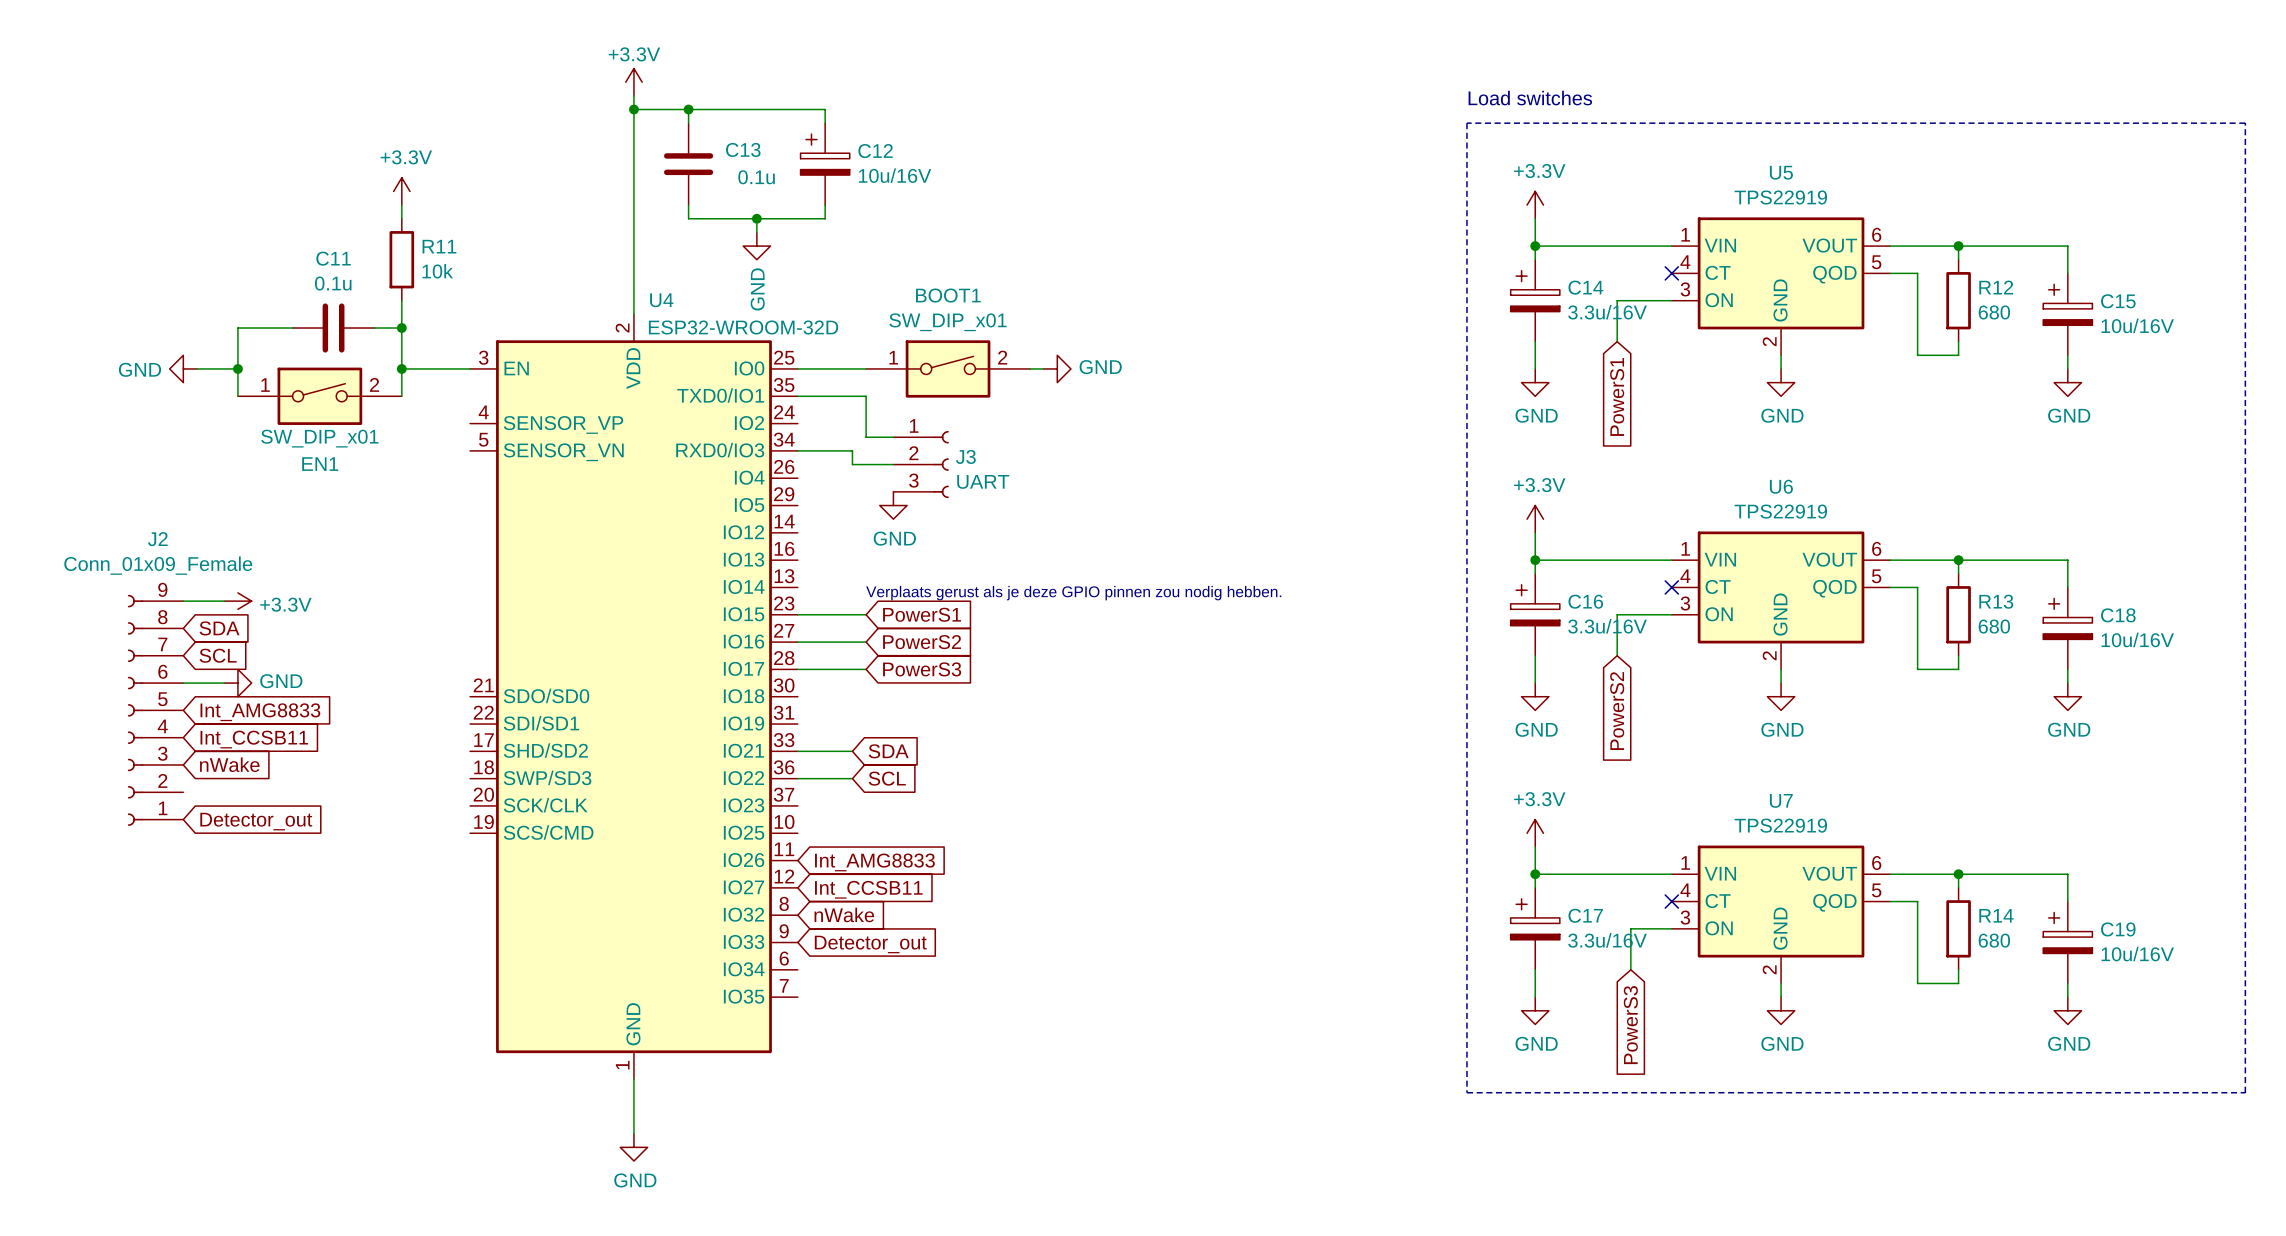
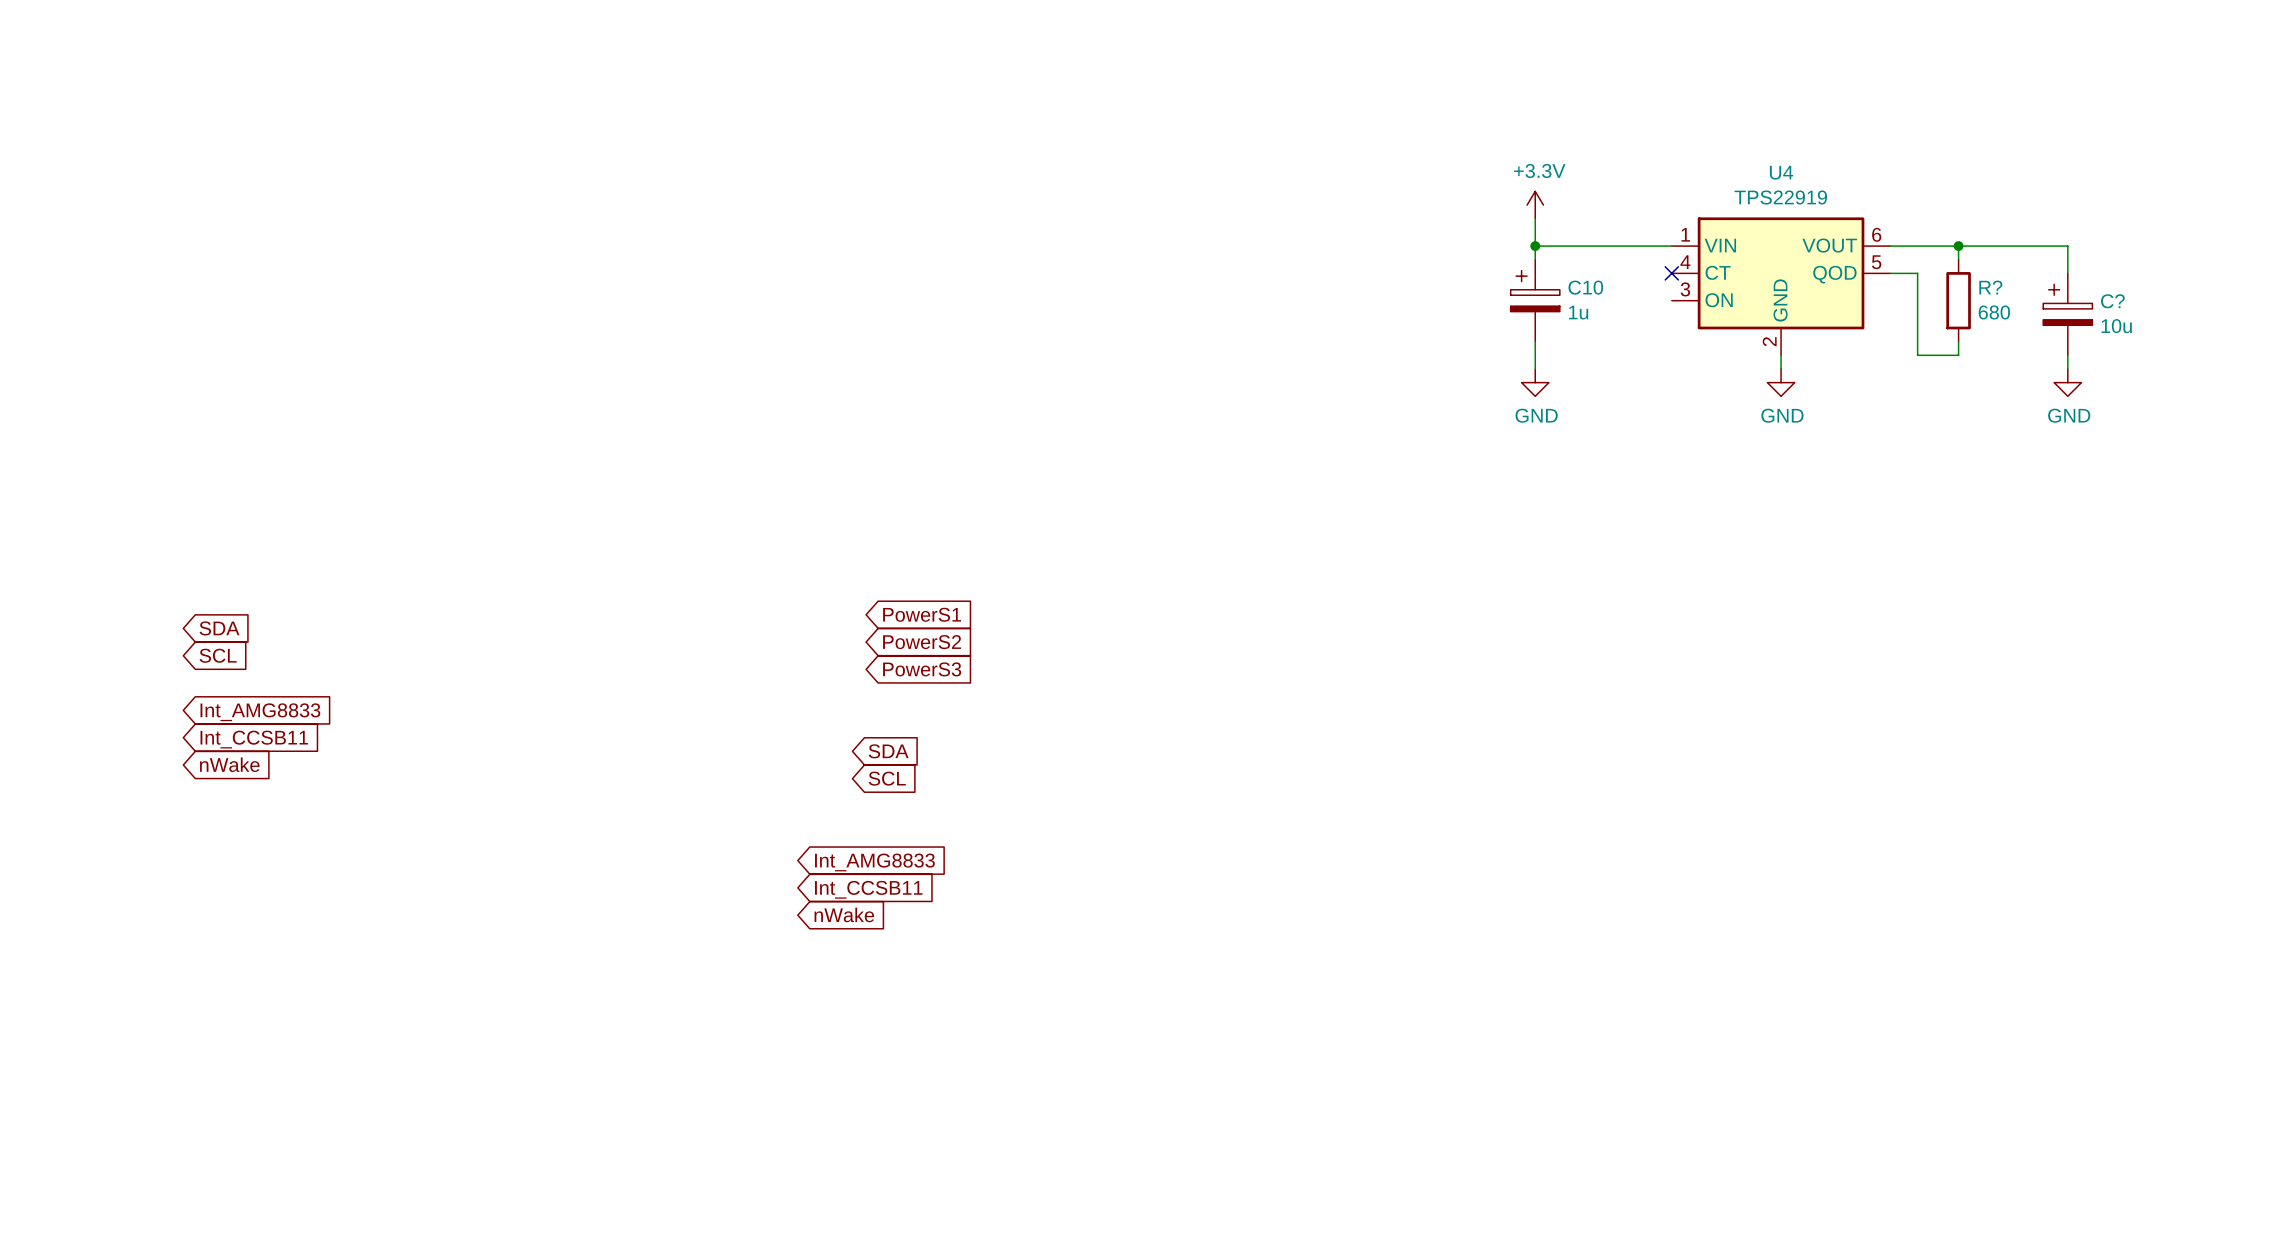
power symbol: +3.3V (633, 82) -> none
wire: (633, 95) (633, 314) -> none
text: Load switches (1530, 98) -> none
wire: (633, 109) (825, 109) (825, 123) -> none
junction: (633, 109) -> none
wire: (688, 109) (688, 123) -> none
junction: (688, 109) -> none
line: (1466, 123) (1466, 1092) (2245, 1092) (2245, 123) (1466, 123) -> none
C13: 0.1u (688, 164) -> none
C12: 10u/16V (825, 164) -> none
U5 name: U5 (1781, 172) -> U4 (1781, 172)
power symbol: +3.3V (401, 191) -> none
wire: (401, 205) (401, 218) -> none
wire: (688, 205) (688, 218) (825, 218) (825, 205) -> none
wire: (756, 218) (756, 232) -> none
junction: (756, 218) -> none
power symbol: GND (756, 246) -> none
R11: 10k (401, 259) -> none
C14 name: C14 (1585, 287) -> C10 (1585, 287)
R12 name: R12 (1996, 287) -> R? (1990, 287)
wire: (401, 300) (401, 396) -> none
wire: (1671, 300) (1617, 300) (1617, 341) -> none
C15 name: C15 (2118, 301) -> C? (2112, 301)
C14 value: 3.3u/16V (1607, 312) -> 1u (1578, 312)
C15 value: 10u/16V (2137, 325) -> 10u (2116, 326)
wire: (292, 328) (237, 328) (237, 396) -> none
C11: 0.1u (333, 328) -> none
wire: (374, 328) (401, 328) -> none
junction: (401, 328) -> none
power symbol: GND (183, 368) -> none
wire: (196, 368) (237, 368) -> none
junction: (237, 368) -> none
wire: (401, 368) (470, 368) -> none
junction: (401, 368) -> none
wire: (797, 368) (866, 368) -> none
BOOT1: SW_DIP_x01 (948, 368) -> none
wire: (1029, 368) (1043, 368) -> none
power symbol: GND (1057, 368) -> none
EN1: SW_DIP_x01 (319, 396) -> none
wire: (797, 396) (866, 396) (866, 437) (893, 437) -> none
global label: PowerS1 (1617, 396) -> none
wire: (797, 450) (852, 450) (852, 464) (893, 464) -> none
J3: UART (921, 464) -> none
power symbol: GND (893, 505) -> none
power symbol: +3.3V (1535, 519) -> none
wire: (1535, 532) (1535, 573) -> none
wire: (1535, 560) (1671, 560) -> none
junction: (1535, 560) -> none
wire: (1890, 560) (2067, 560) (2067, 587) -> none
wire: (1958, 560) (1958, 573) -> none
junction: (1958, 560) -> none
no-connect mark: (1671, 587) -> none
wire: (1890, 587) (1917, 587) (1917, 669) (1958, 669) (1958, 655) -> none
text: Verplaats gerust als je deze GPIO pinnen zou nodig hebben. (1073, 593) -> none
U6: TPS22919 (1781, 600) -> none
wire: (183, 601) (224, 601) -> none
power symbol: +3.3V (237, 601) -> none
wire: (797, 614) (866, 614) -> none
C16: 3.3u/16V (1535, 614) -> none
wire: (1671, 614) (1617, 614) (1617, 655) -> none
R13: 680 (1958, 614) -> none
C18: 10u/16V (2067, 628) -> none
wire: (797, 642) (866, 642) -> none
wire: (1535, 655) (1535, 683) -> none
wire: (797, 669) (866, 669) -> none
wire: (1781, 669) (1781, 683) -> none
wire: (2067, 669) (2067, 683) -> none
wire: (183, 683) (224, 683) -> none
power symbol: GND (237, 683) -> none
U4: ESP32-WROOM-32D (633, 696) -> none
power symbol: GND (1535, 696) -> none
power symbol: GND (1781, 696) -> none
power symbol: GND (2067, 696) -> none
J2: Conn_01x09_Female (155, 710) -> none
global label: PowerS2 (1617, 711) -> none
wire: (797, 751) (852, 751) -> none
wire: (797, 778) (852, 778) -> none
global label: Detector_out (256, 821) -> none
power symbol: +3.3V (1535, 833) -> none
wire: (1535, 846) (1535, 887) -> none
wire: (1535, 874) (1671, 874) -> none
junction: (1535, 874) -> none
wire: (1890, 874) (2067, 874) (2067, 901) -> none
wire: (1958, 874) (1958, 887) -> none
junction: (1958, 874) -> none
no-connect mark: (1671, 901) -> none
wire: (1890, 901) (1917, 901) (1917, 983) (1958, 983) (1958, 969) -> none
U7: TPS22919 (1781, 914) -> none
C17: 3.3u/16V (1535, 928) -> none
wire: (1671, 928) (1630, 928) (1630, 969) -> none
R14: 680 (1958, 928) -> none
C19: 10u/16V (2067, 942) -> none
global label: Detector_out (870, 944) -> none
wire: (1535, 969) (1535, 997) -> none
wire: (1781, 983) (1781, 997) -> none
wire: (2067, 983) (2067, 997) -> none
power symbol: GND (1535, 1010) -> none
power symbol: GND (1781, 1010) -> none
power symbol: GND (2067, 1010) -> none
global label: PowerS3 (1630, 1025) -> none
wire: (633, 1079) (633, 1133) -> none
power symbol: GND (633, 1147) -> none

